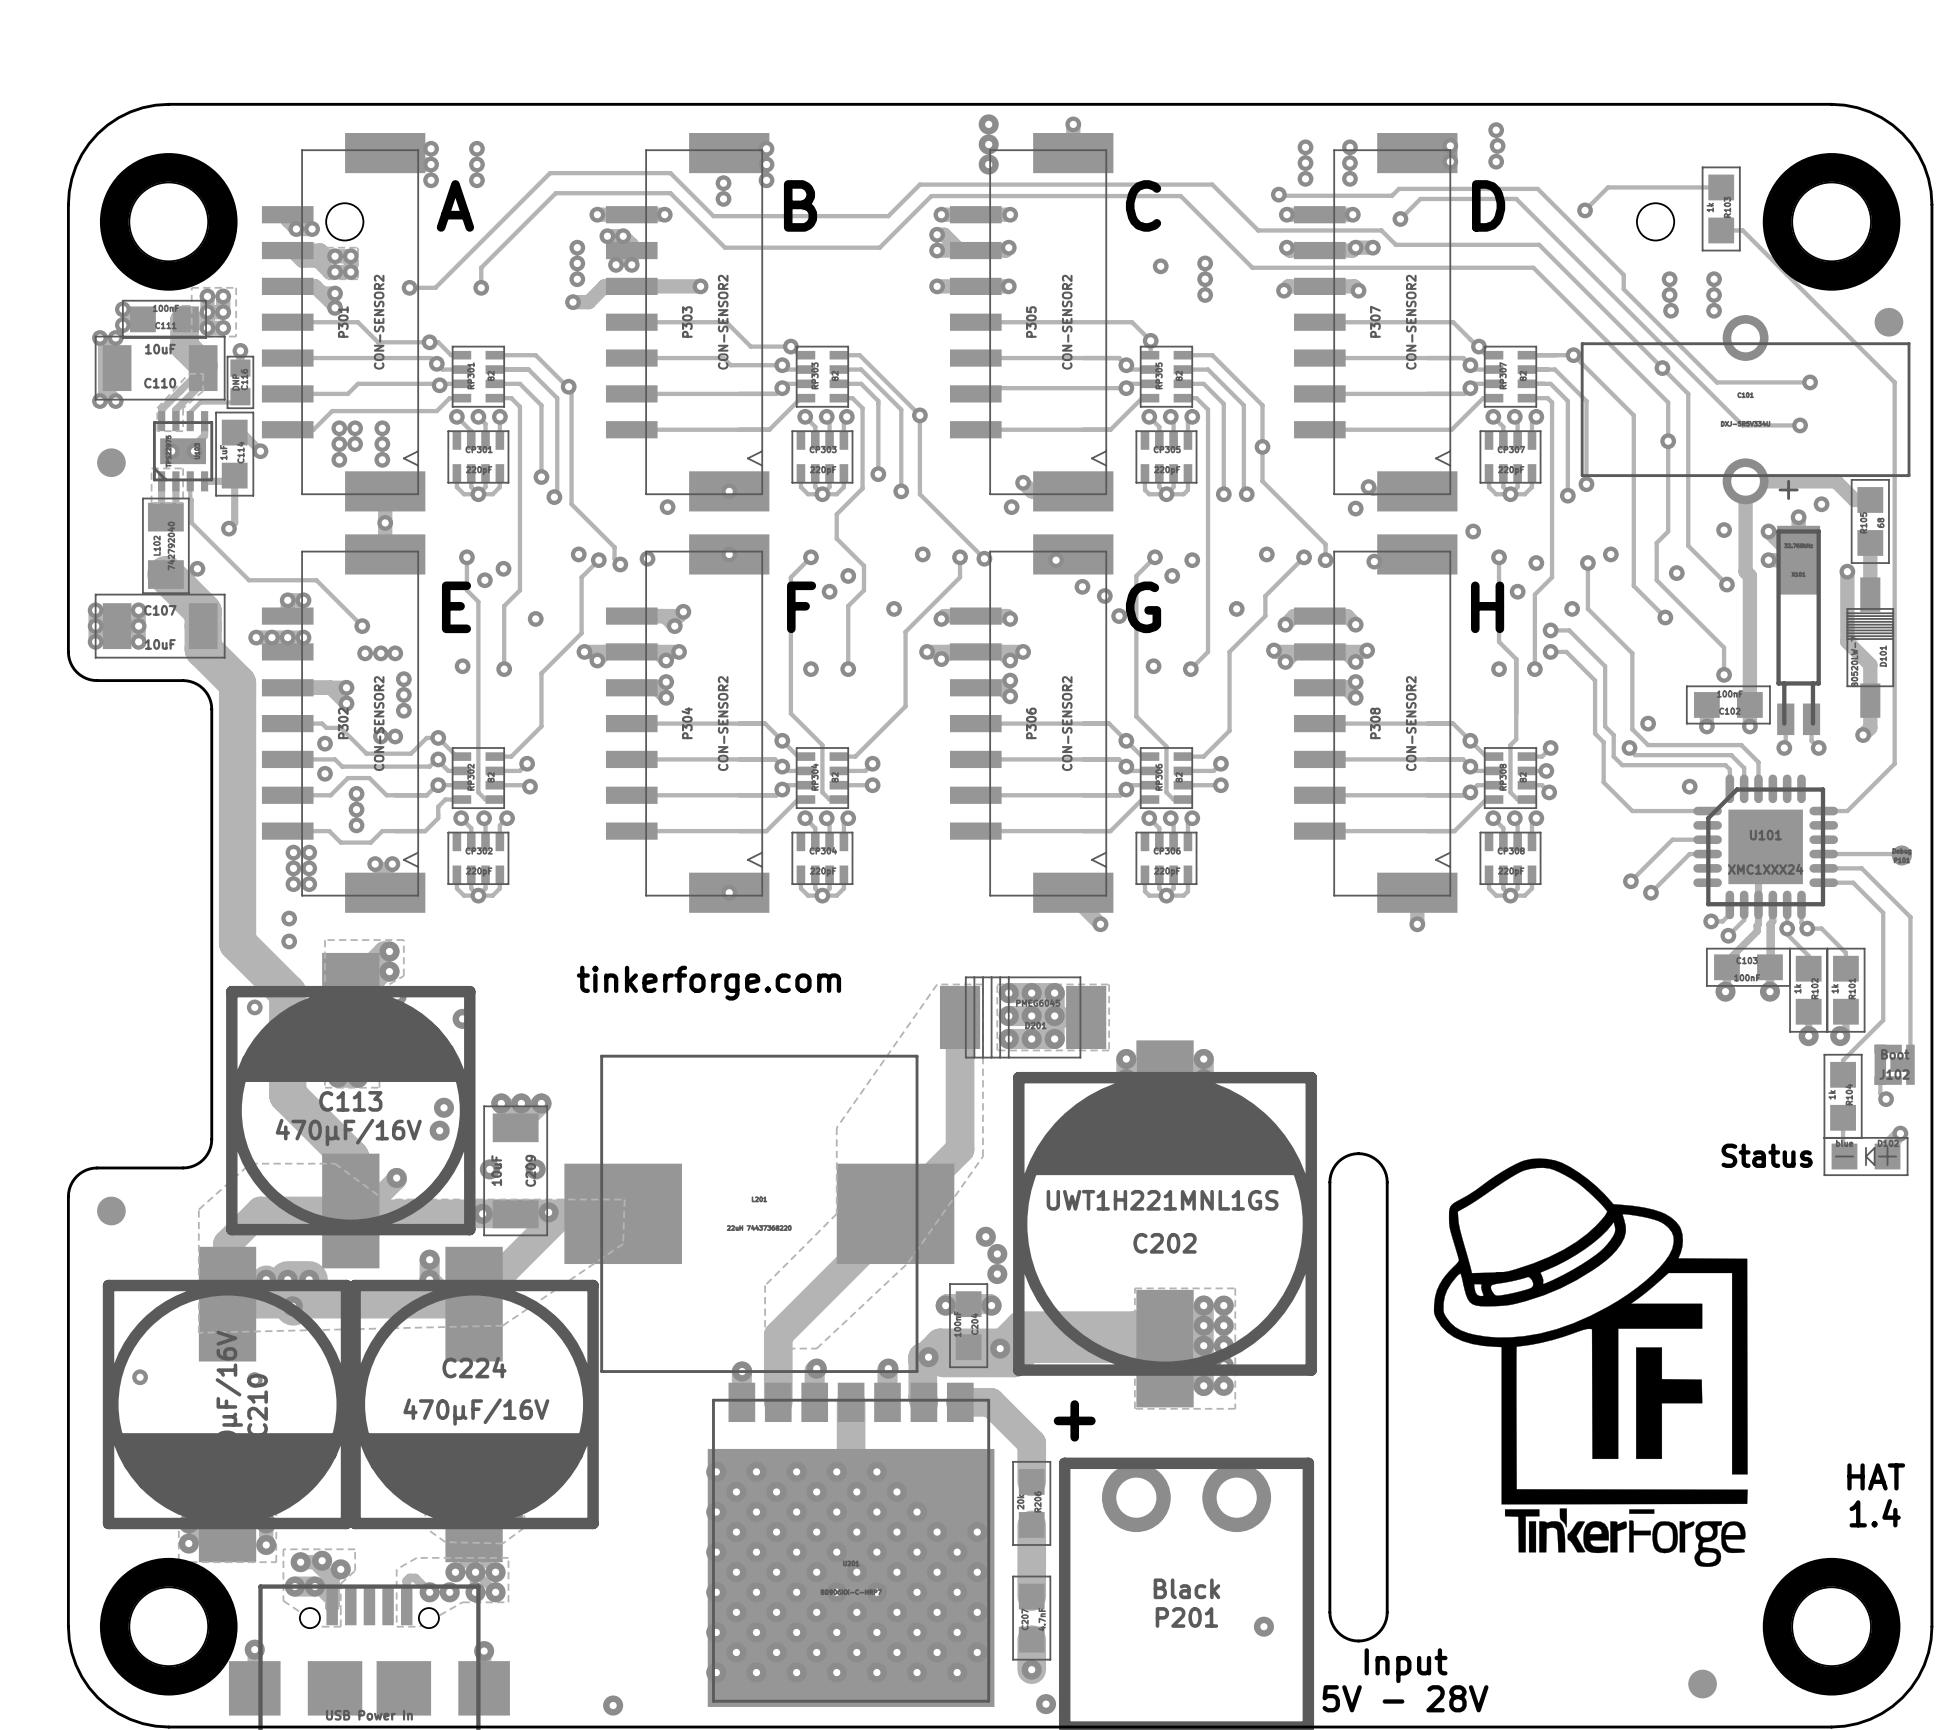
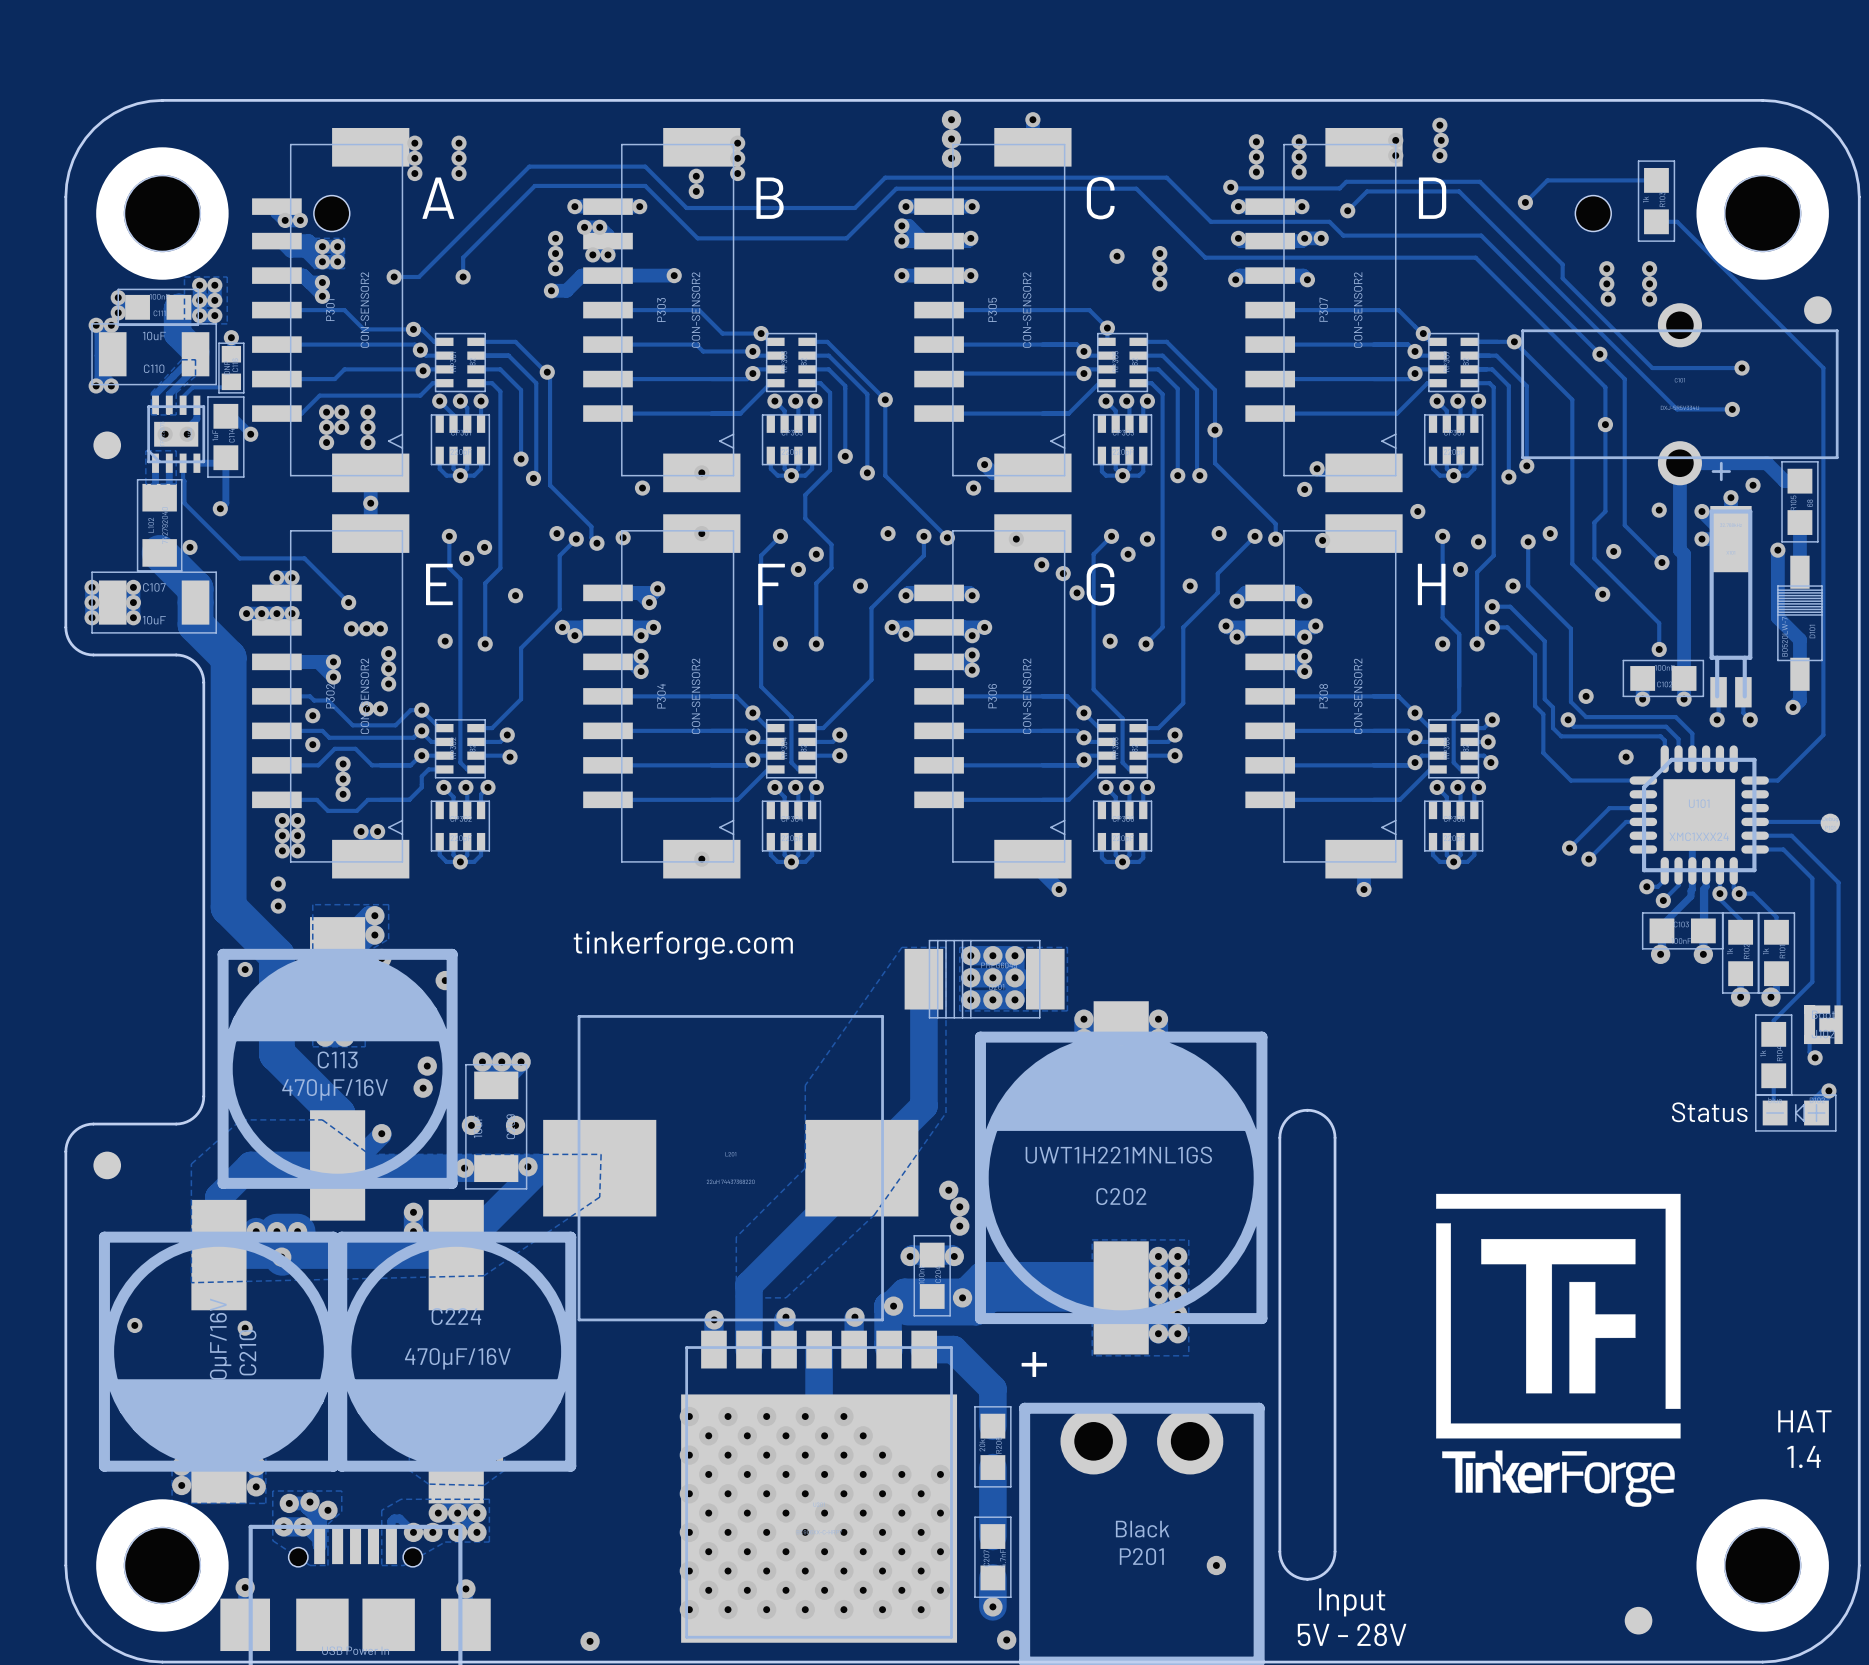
drawing: [1433, 1158, 1748, 1567] -> none
drawing: none -> [1436, 1193, 1681, 1507]

